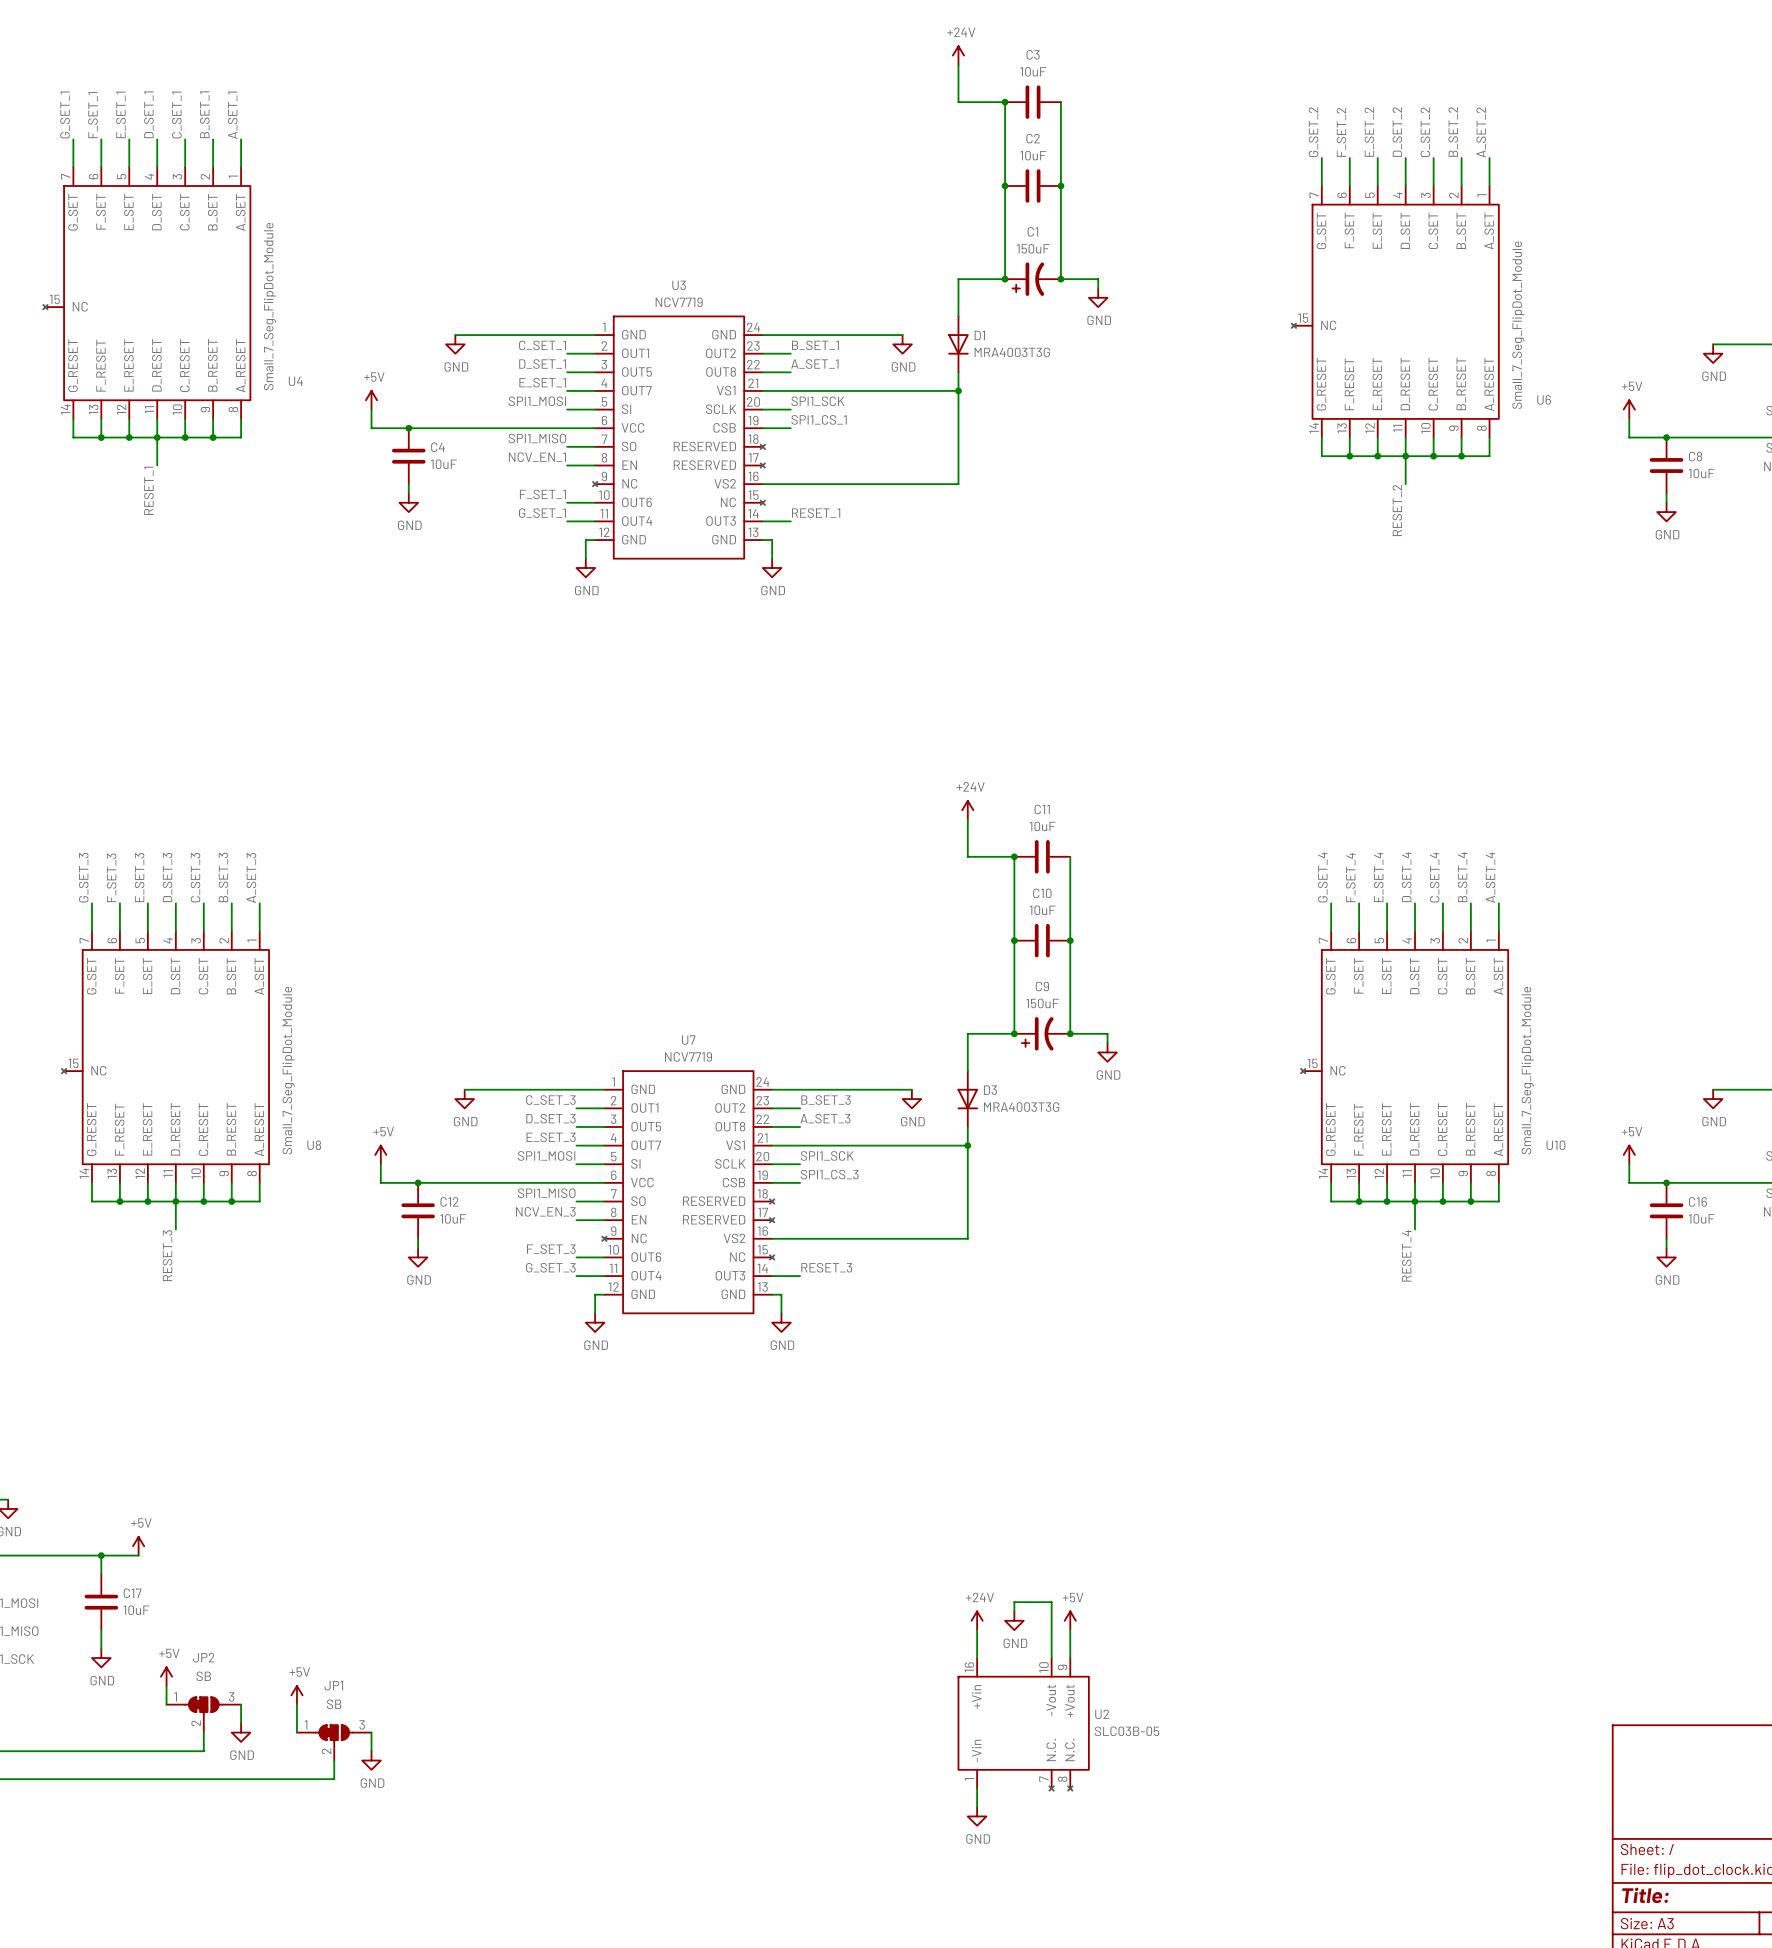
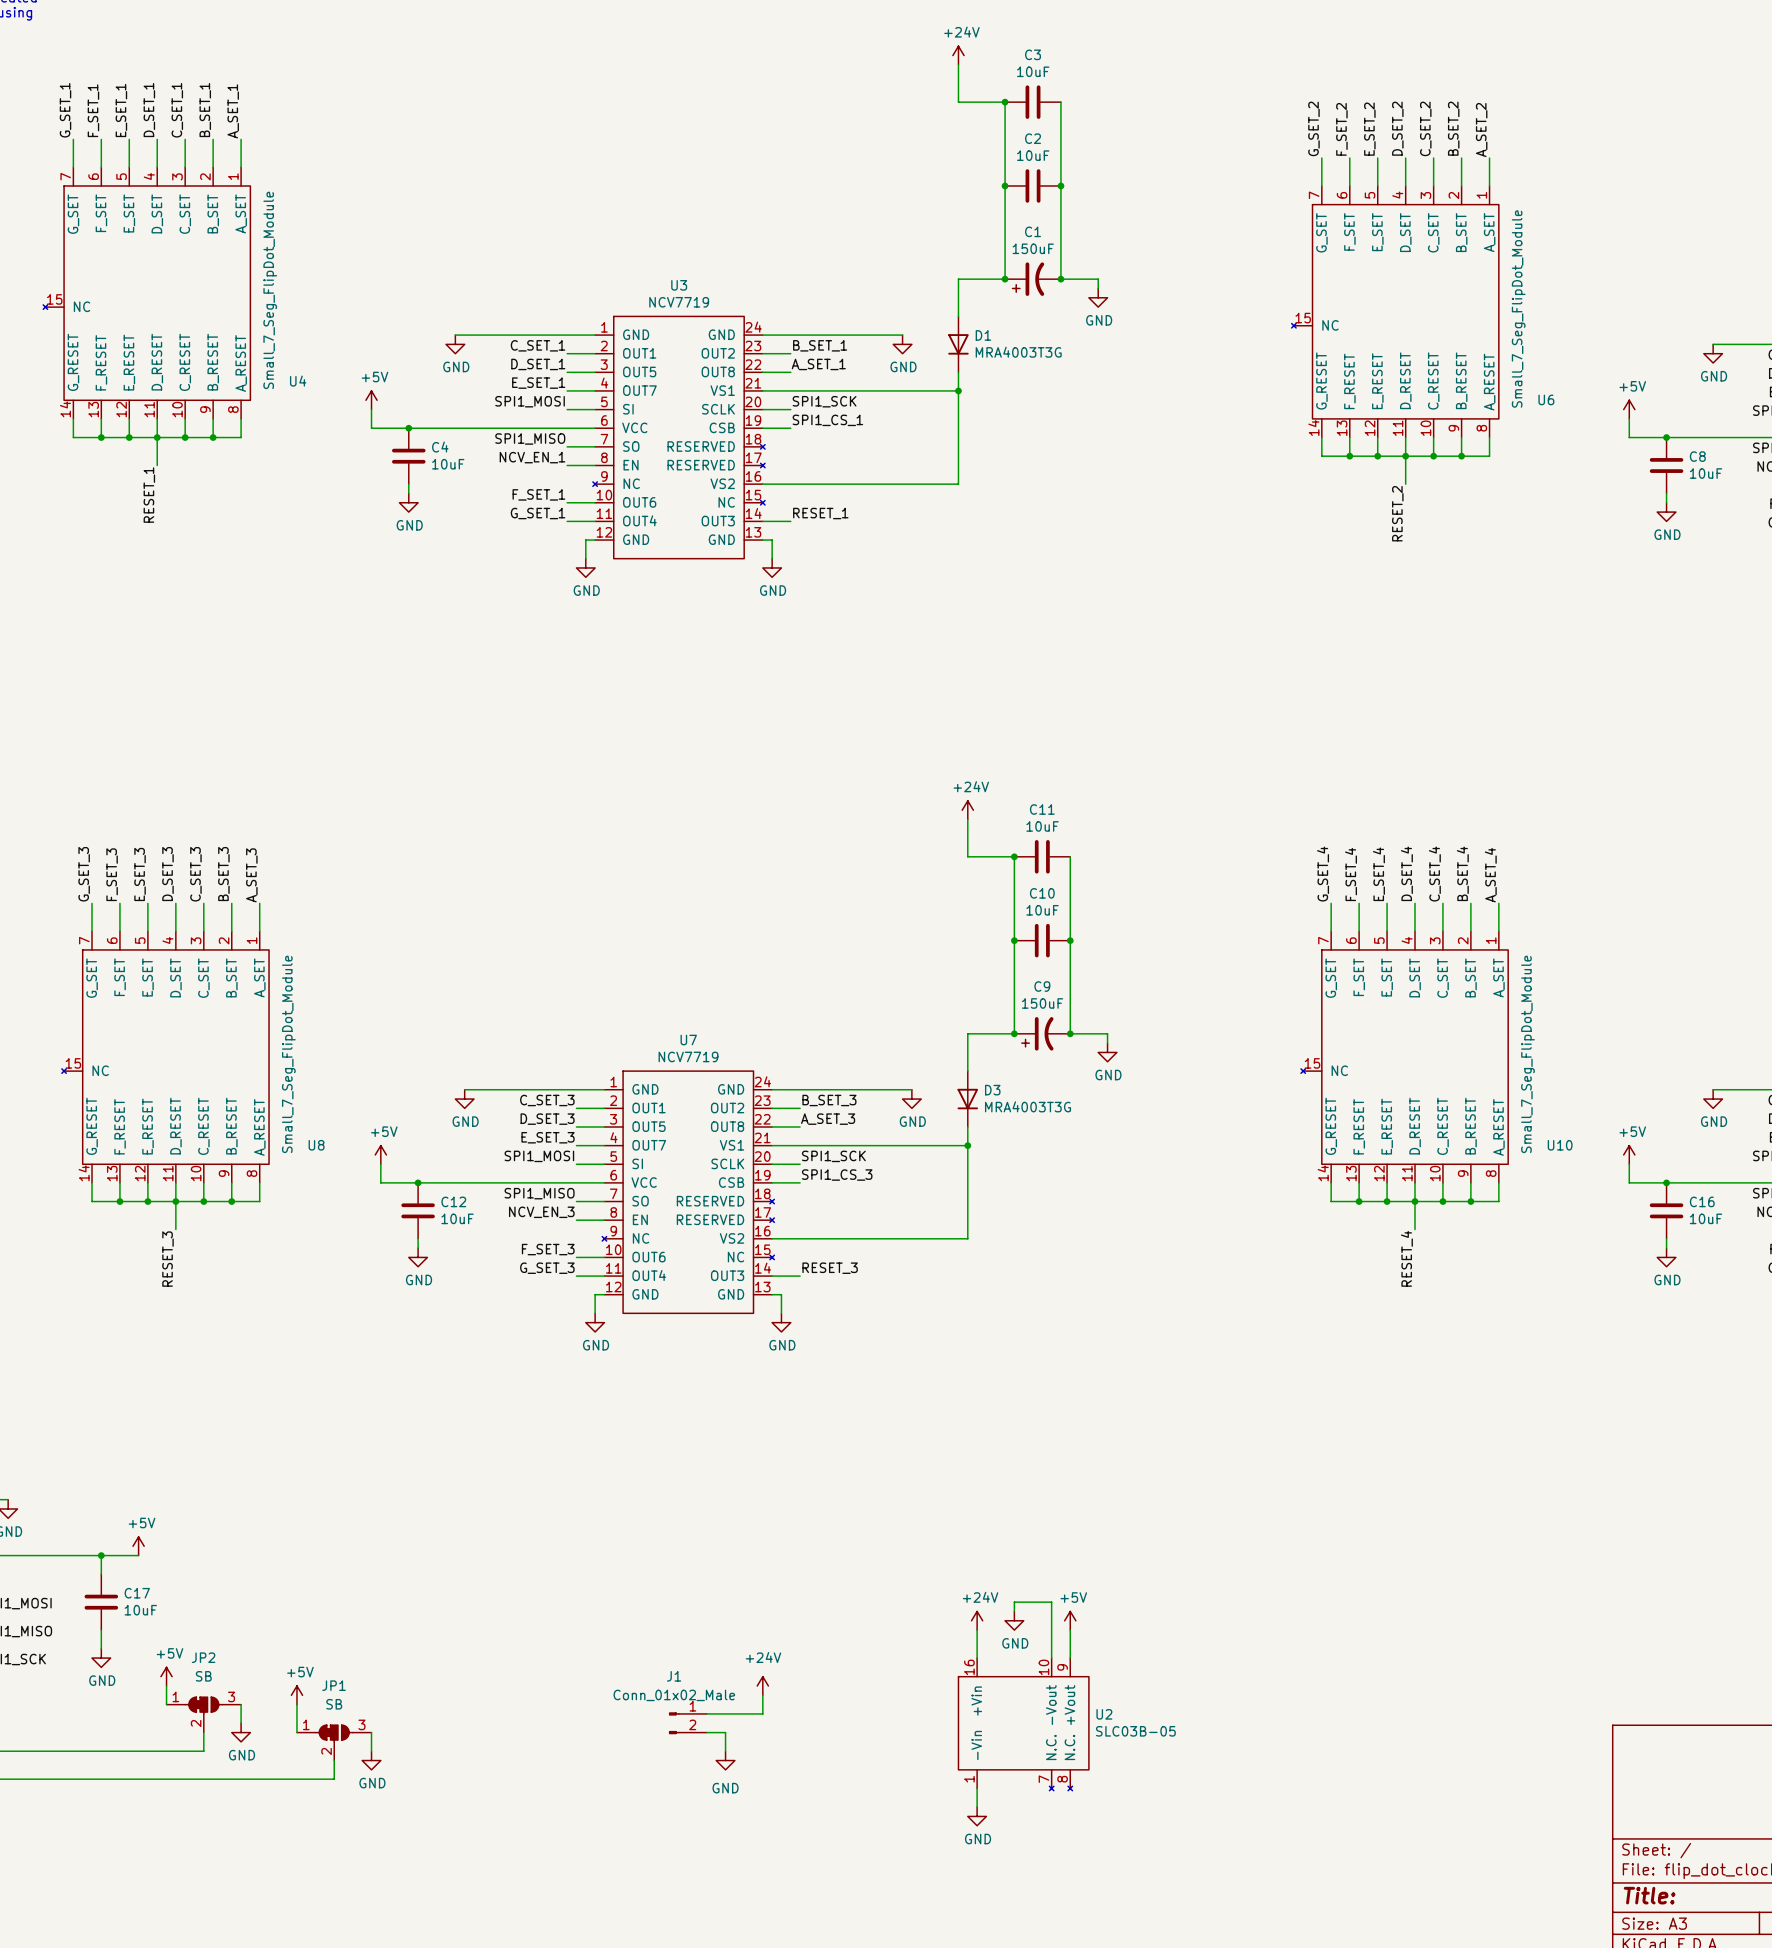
power symbol: none -> +24V (762, 1686)
wire: none -> (762, 1695) (762, 1713) (706, 1713)
J1: none -> Conn_01x02_Male (688, 1723)
wire: none -> (706, 1732) (725, 1732) (725, 1751)
power symbol: none -> GND (725, 1760)

